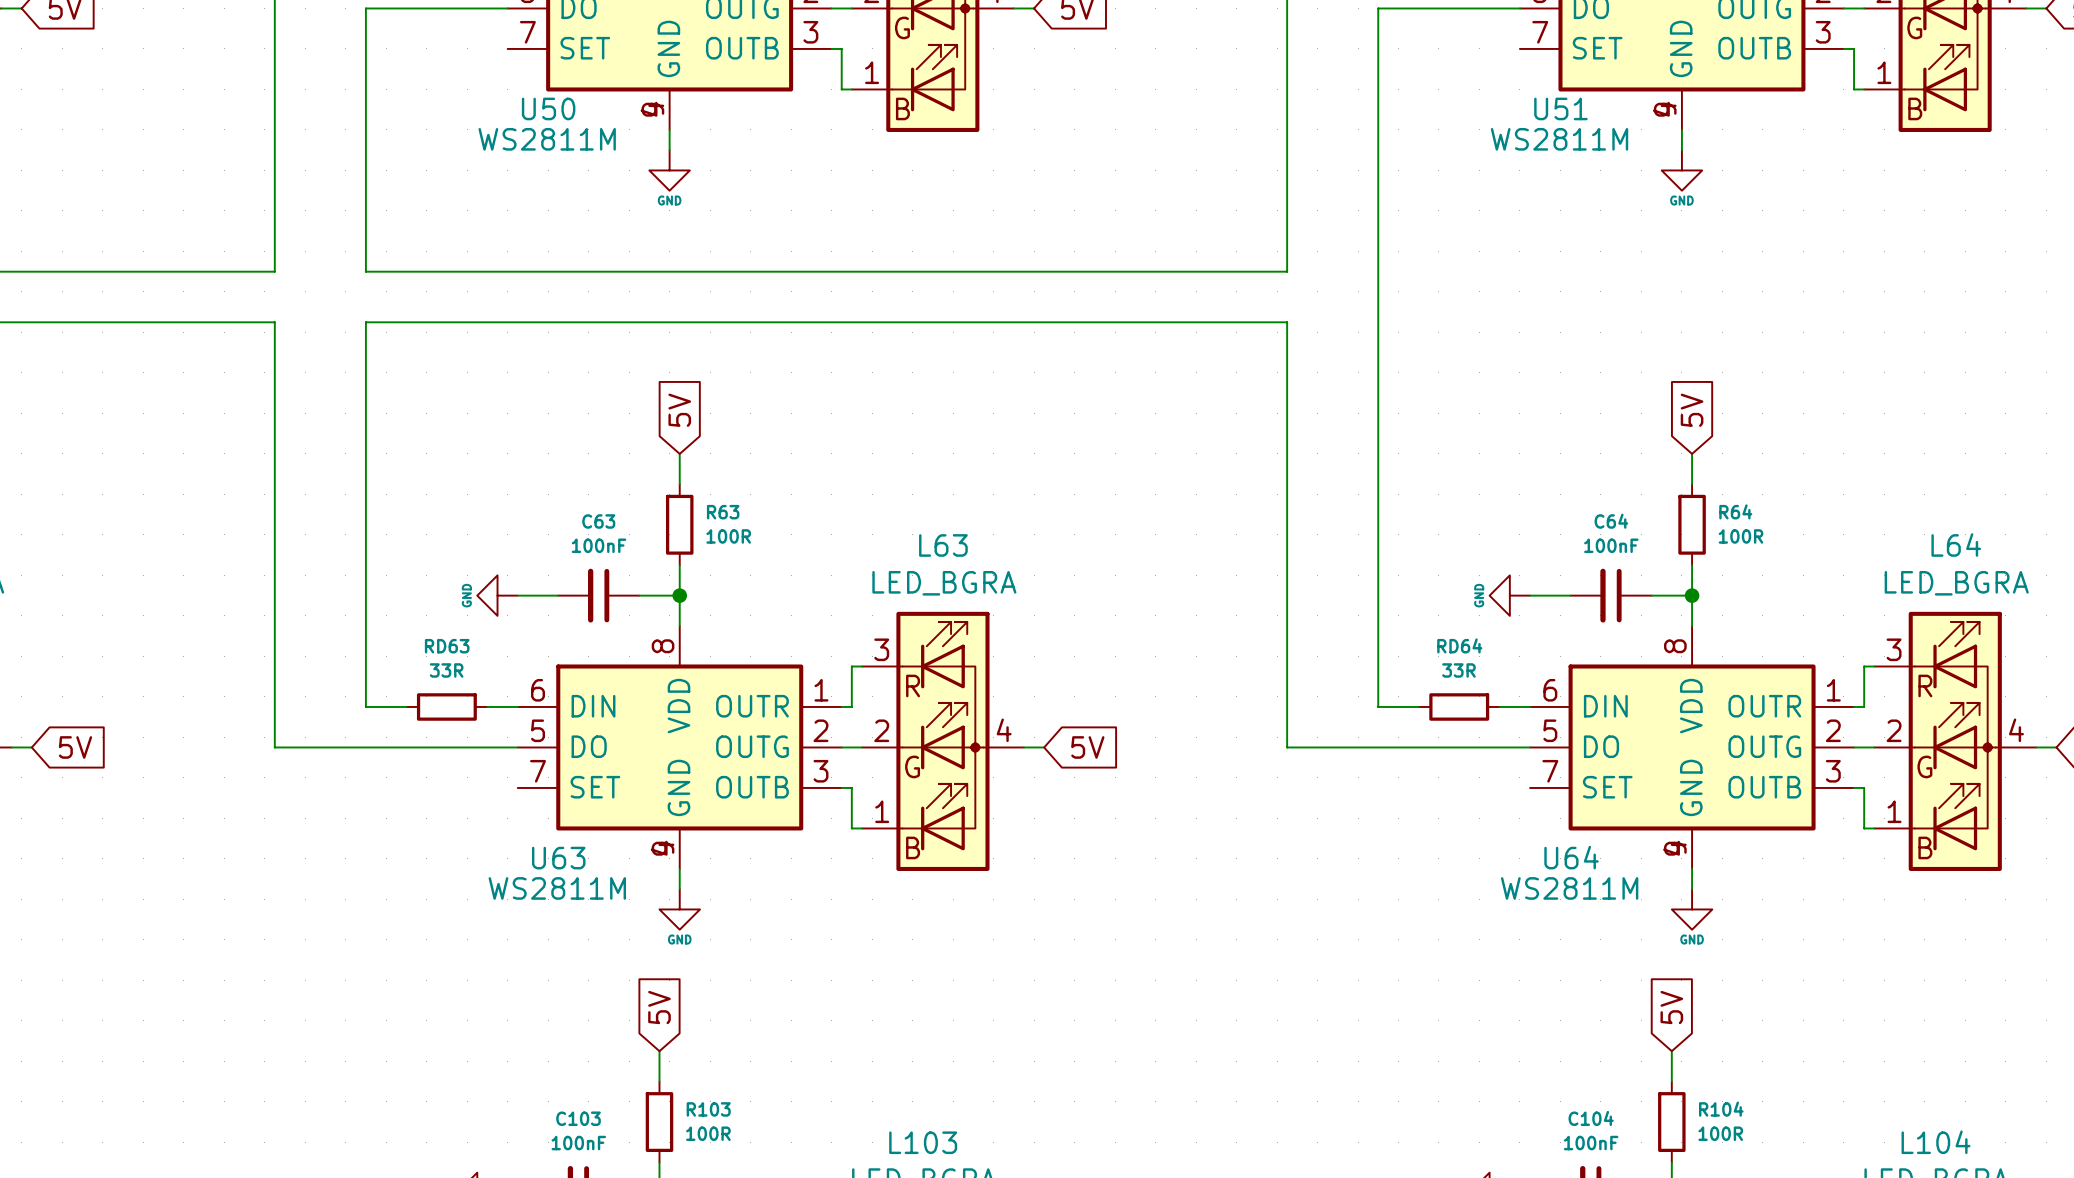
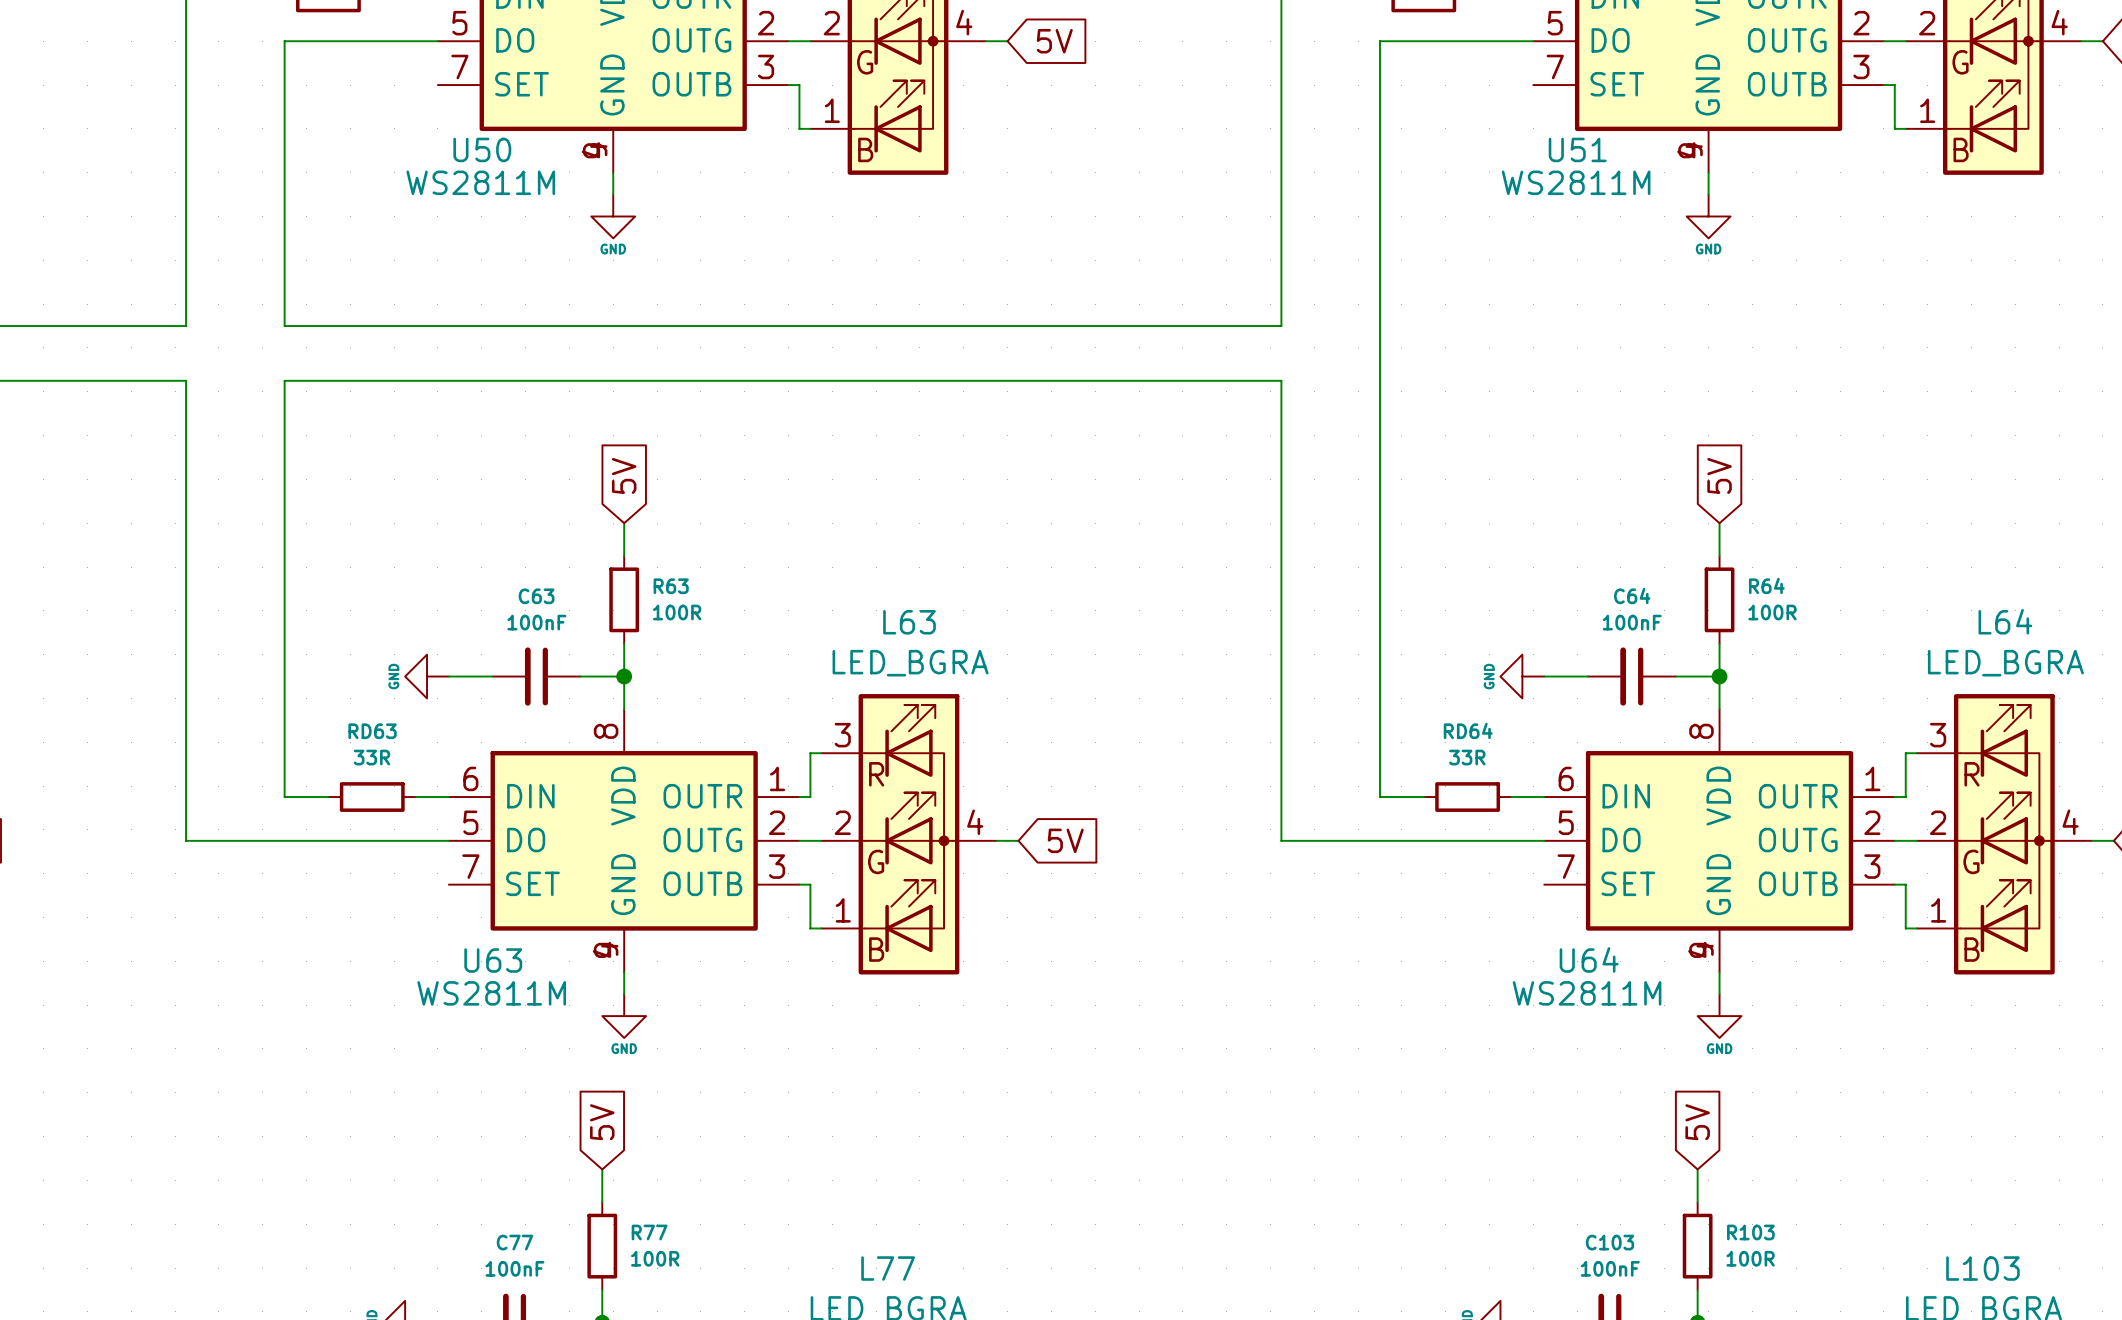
R103 name: R103 (708, 1109) -> R77 (649, 1232)
R104 name: R104 (1721, 1109) -> R103 (1750, 1232)
C103 name: C103 (578, 1118) -> C77 (514, 1242)
C104 name: C104 (1591, 1118) -> C103 (1610, 1242)
L103 name: L103 (923, 1142) -> L77 (888, 1268)
L104 name: L104 (1935, 1142) -> L103 (1982, 1268)

